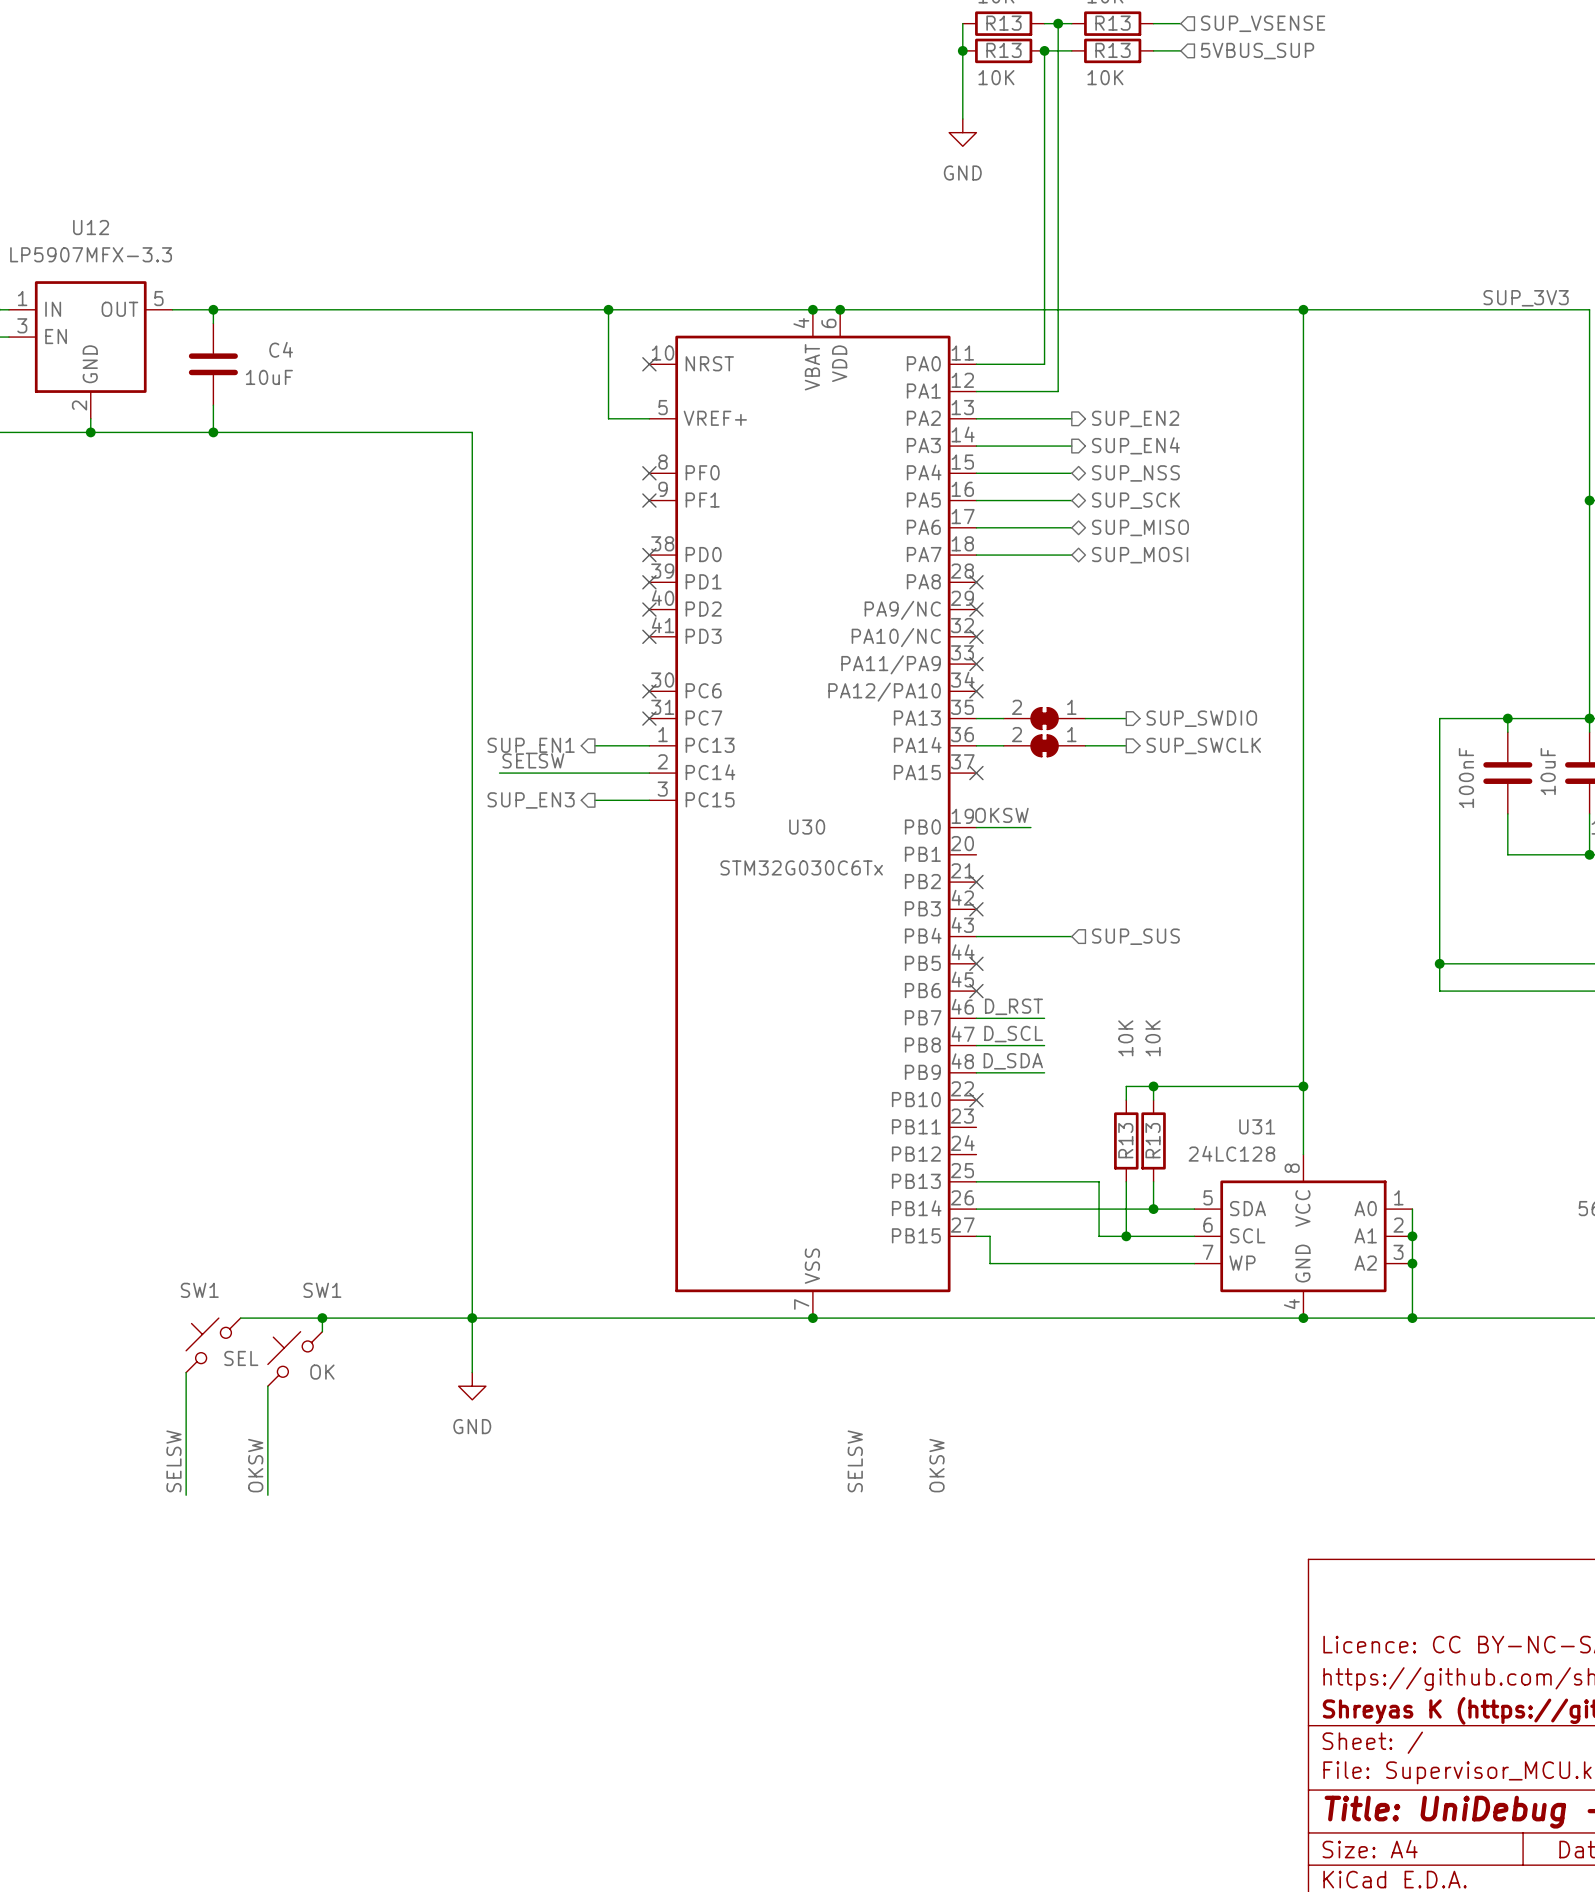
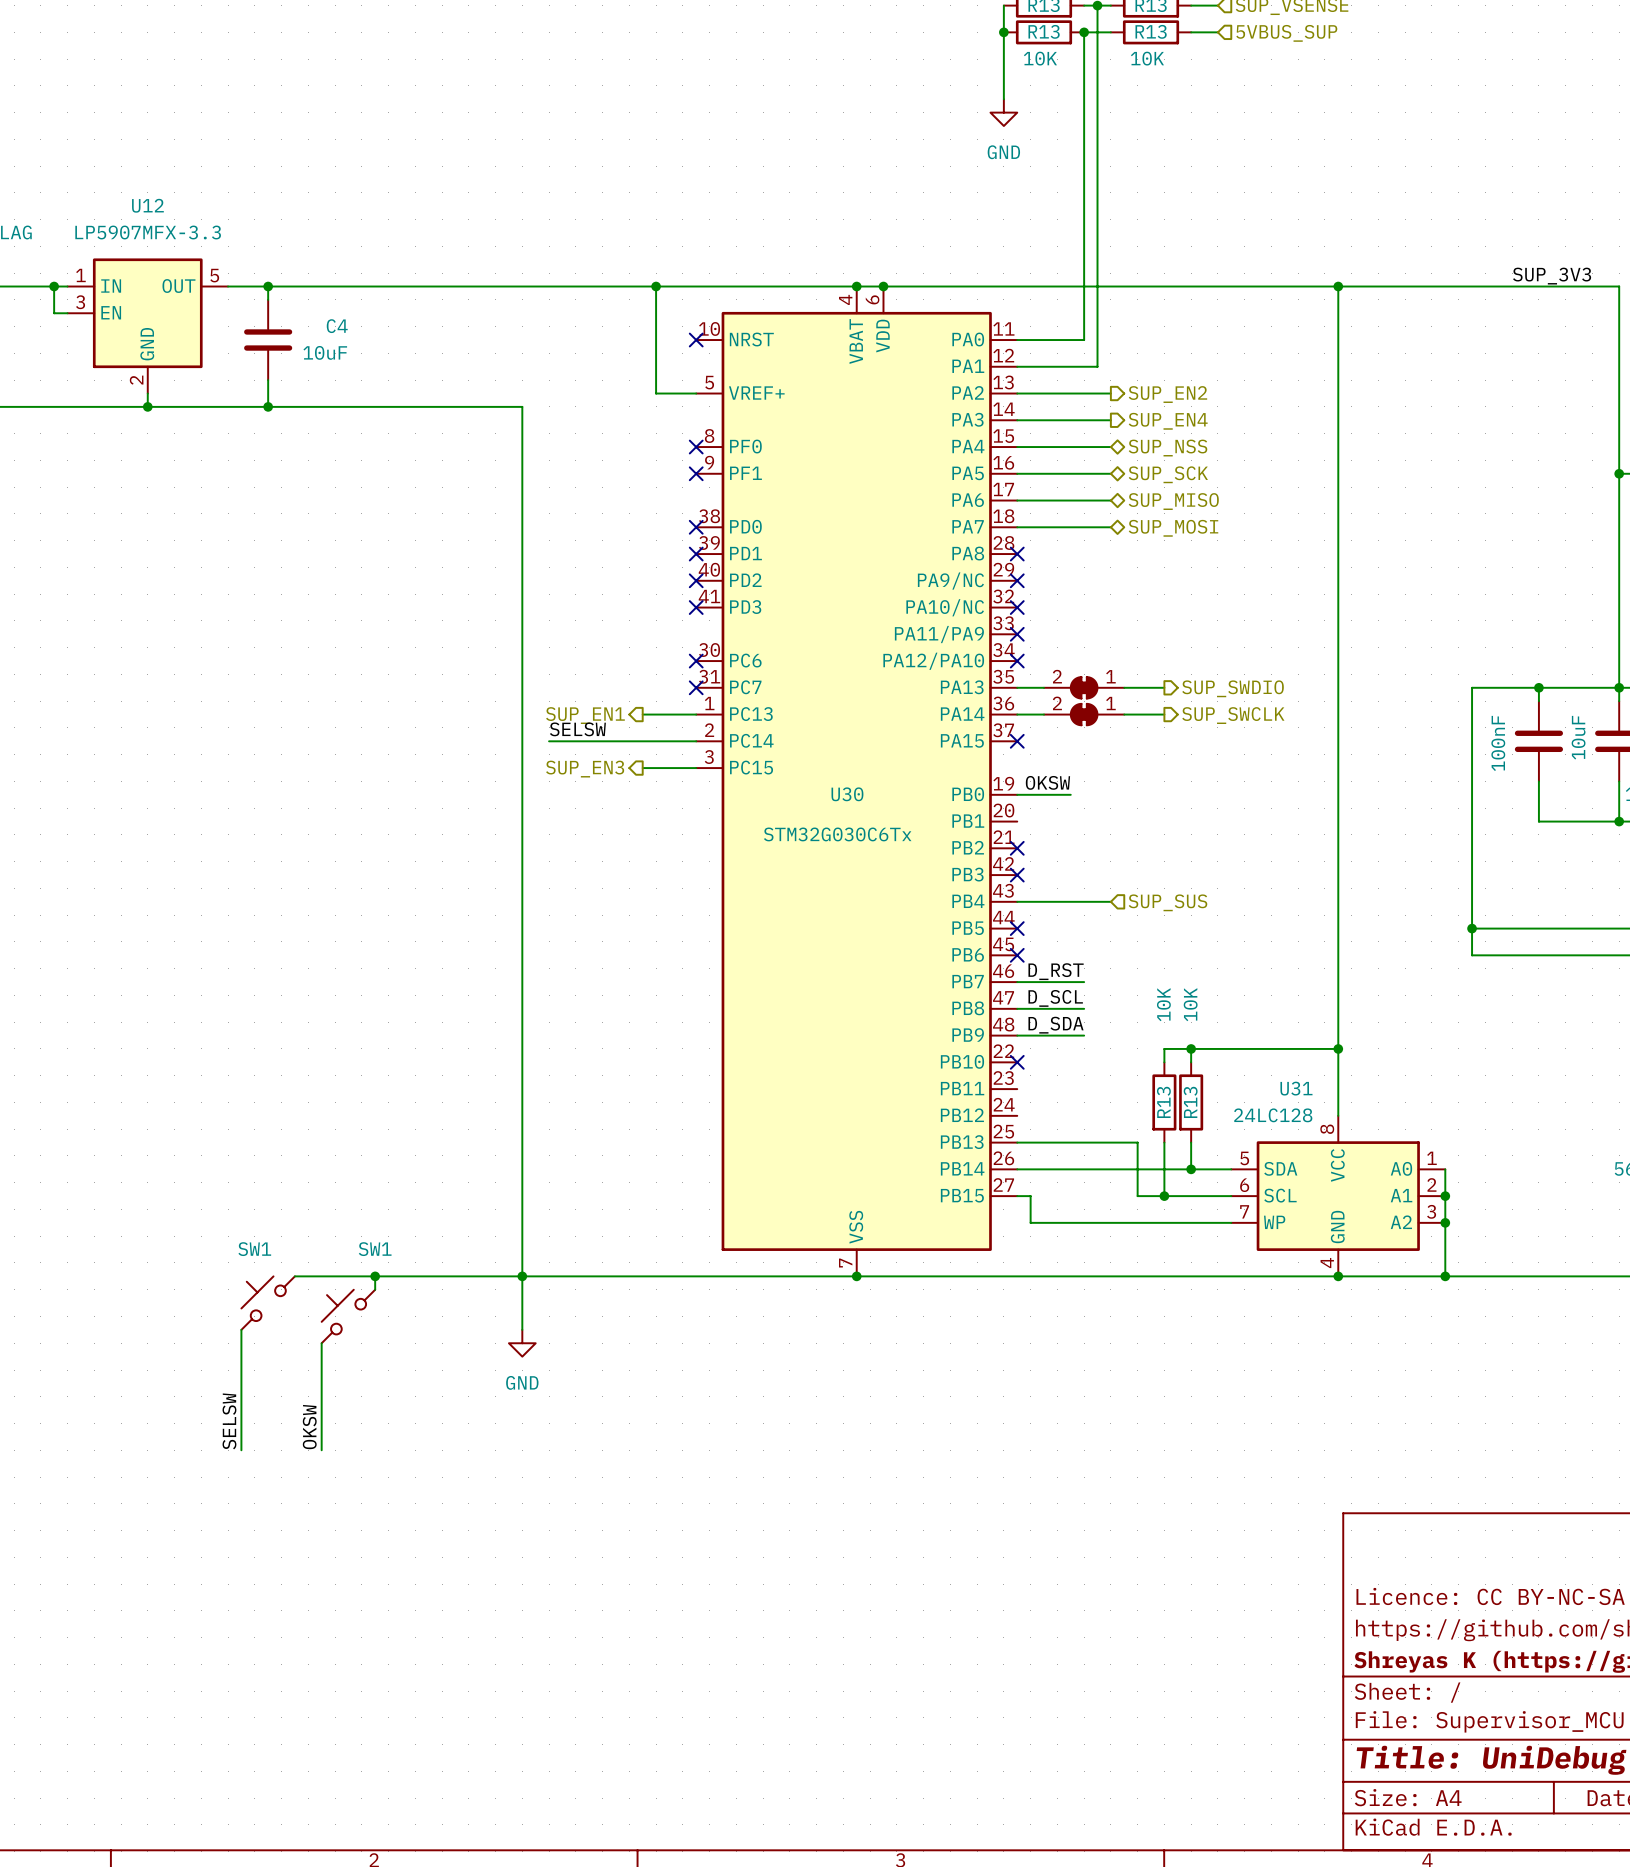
SW1 value: SEL (241, 1358) -> none
SW1 value: OK (322, 1372) -> none
label: SELSW (855, 1461) -> none
label: OKSW (937, 1465) -> none

